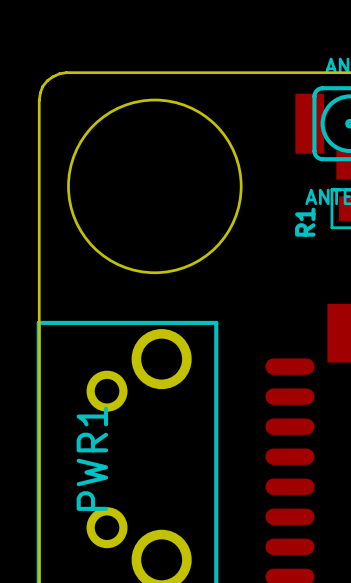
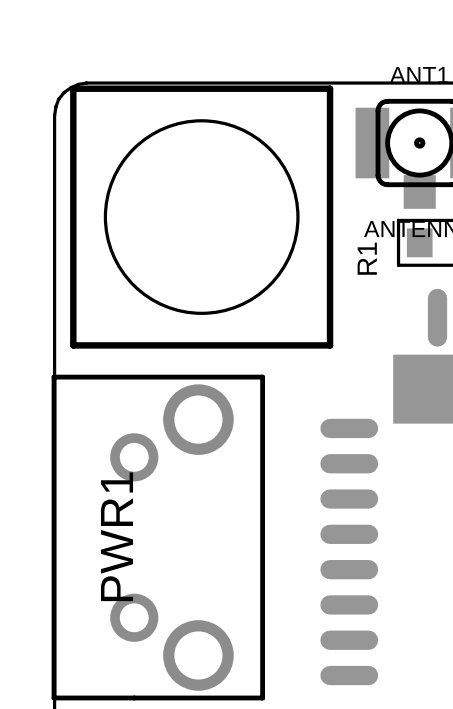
line: none -> (73, 88) (330, 88) (330, 345) (73, 345) (73, 88)
round board edge size: [67, 98, 243, 275] -> [103, 119, 300, 315]

